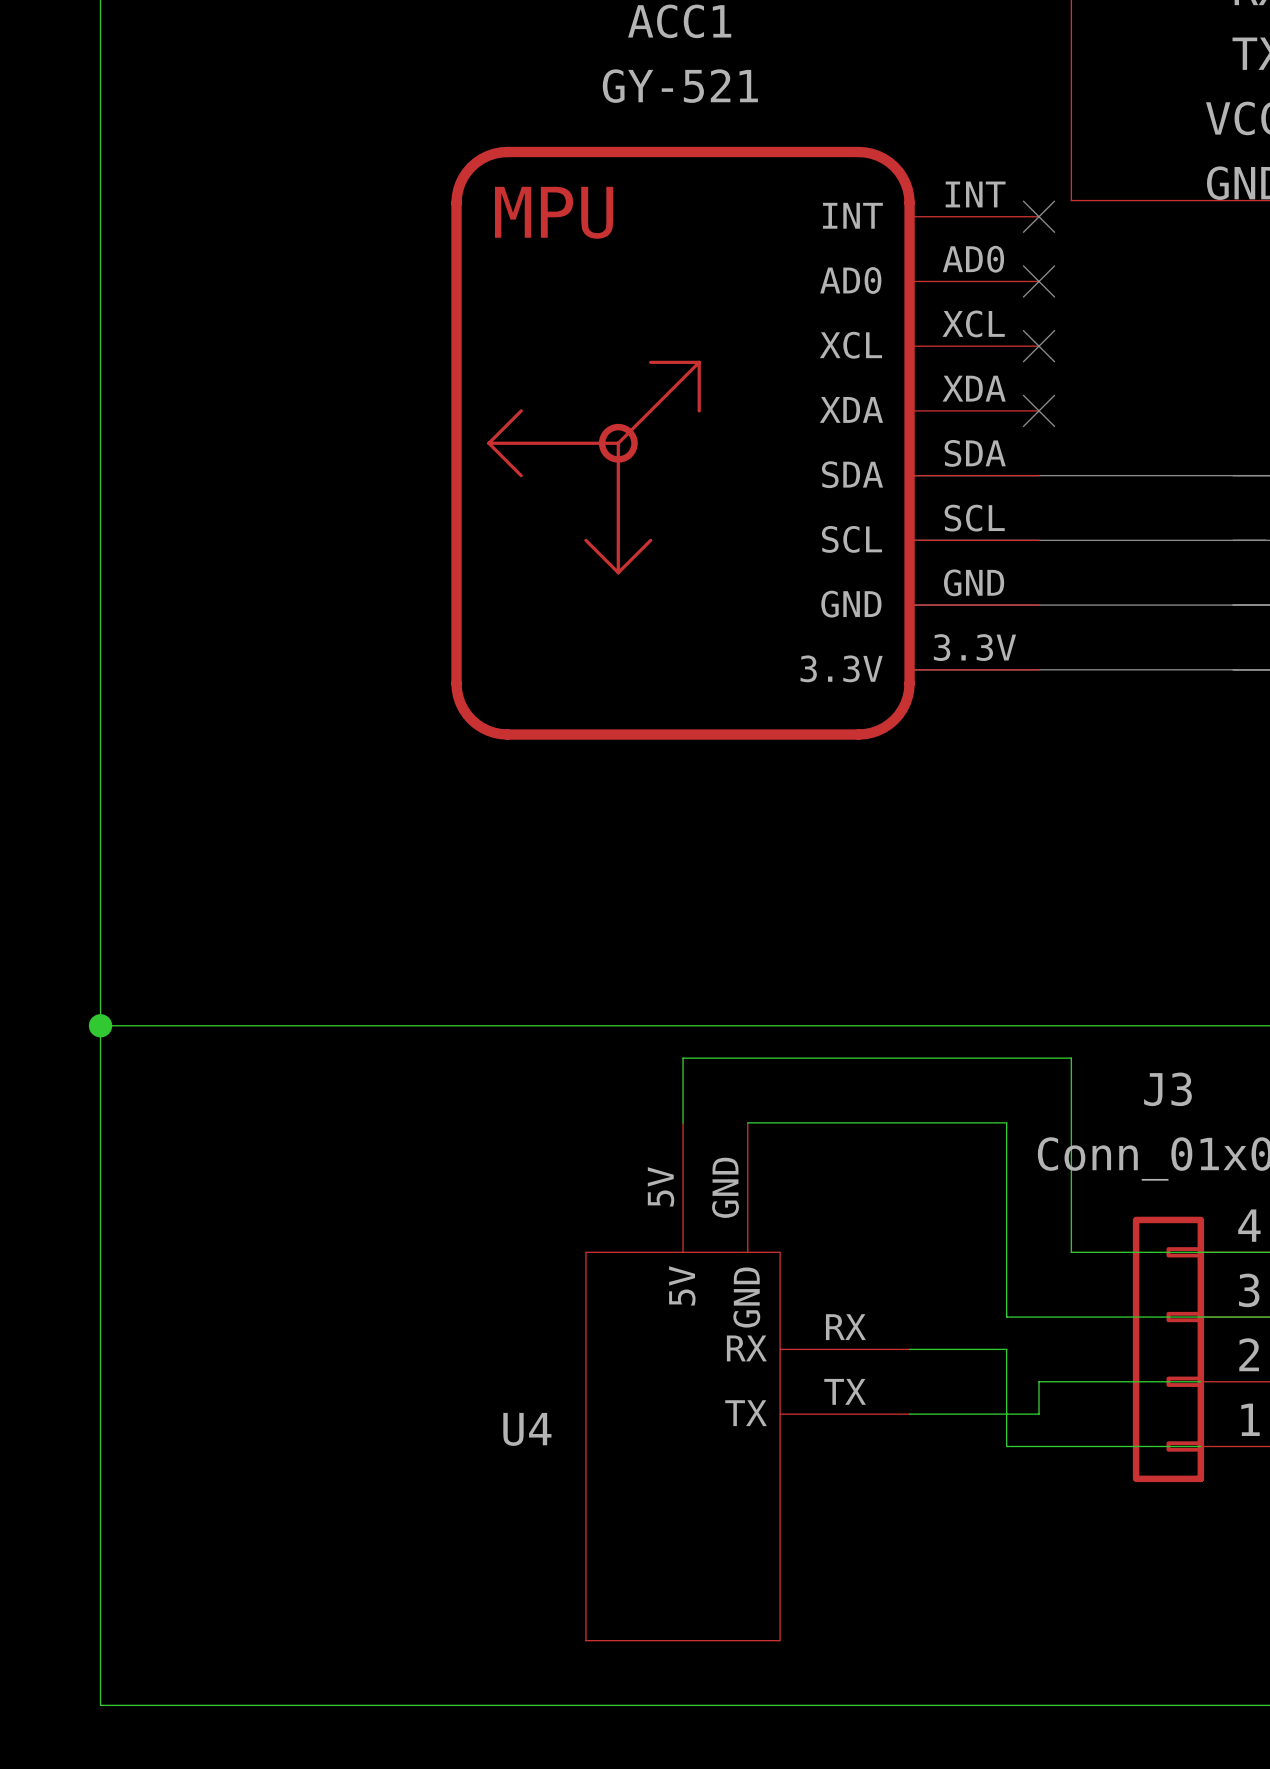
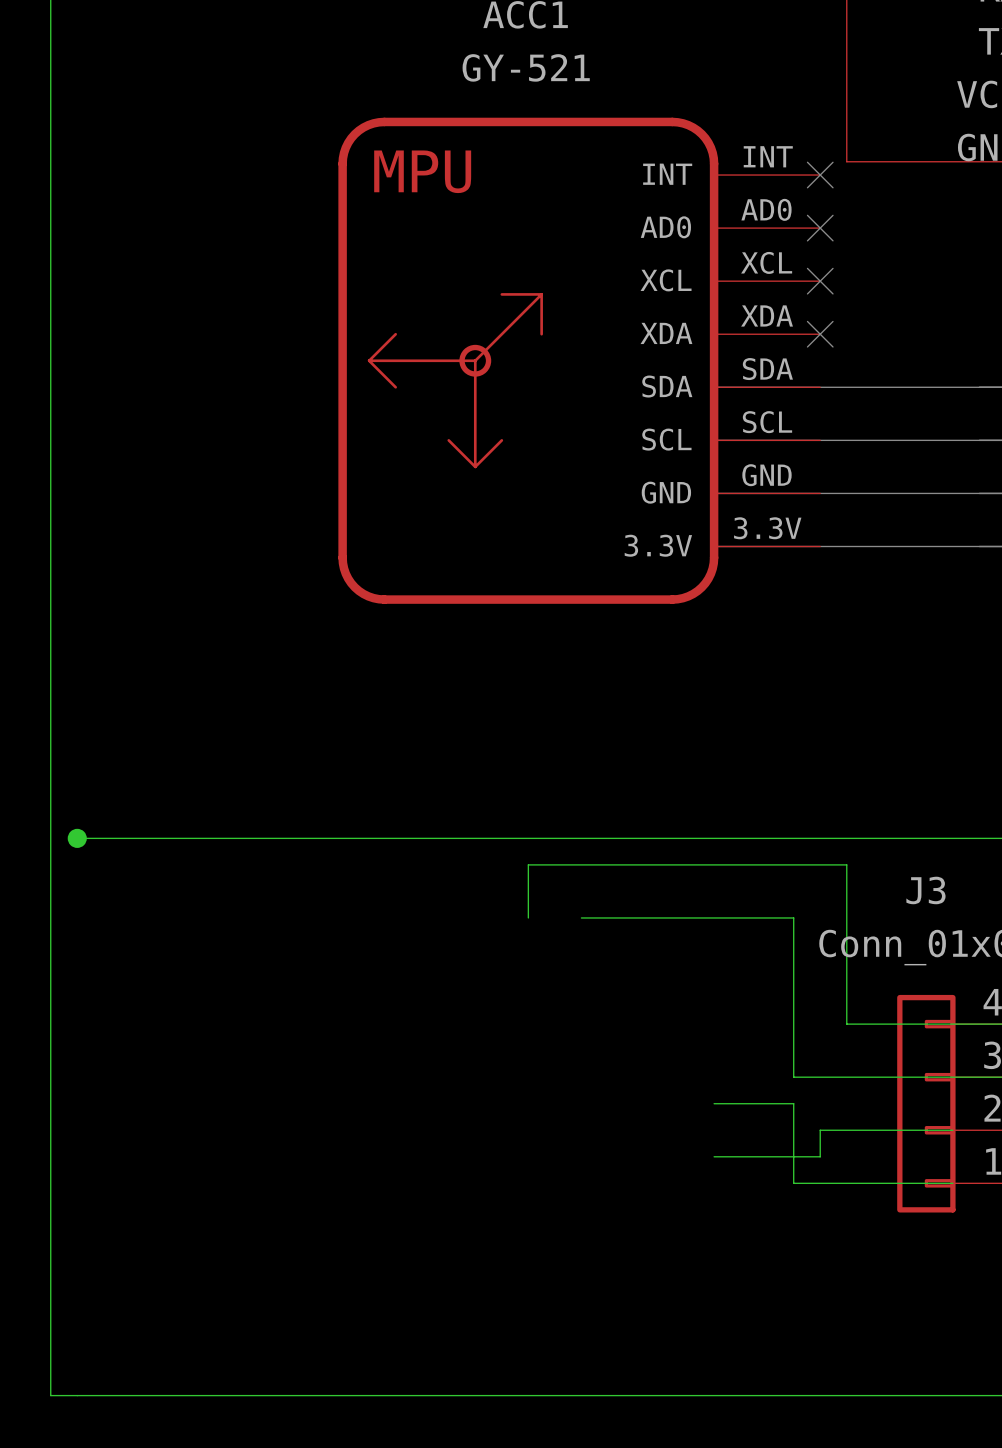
wire: (100, 1025) (132, 1025) -> none
junction position: (100, 1025) -> (77, 838)
U4: (747, 1381) -> none

